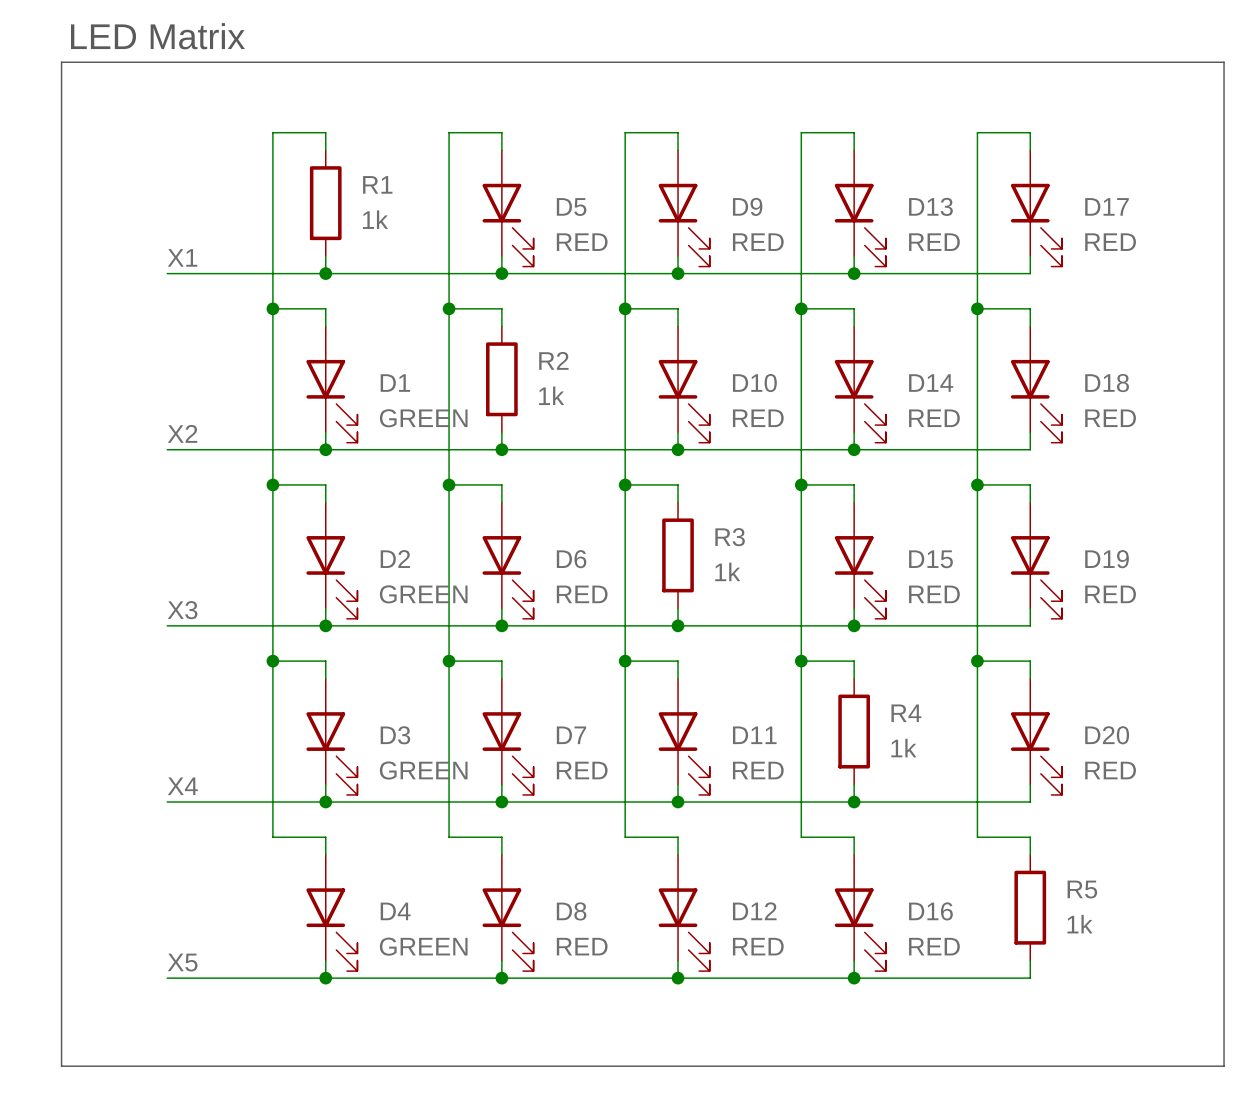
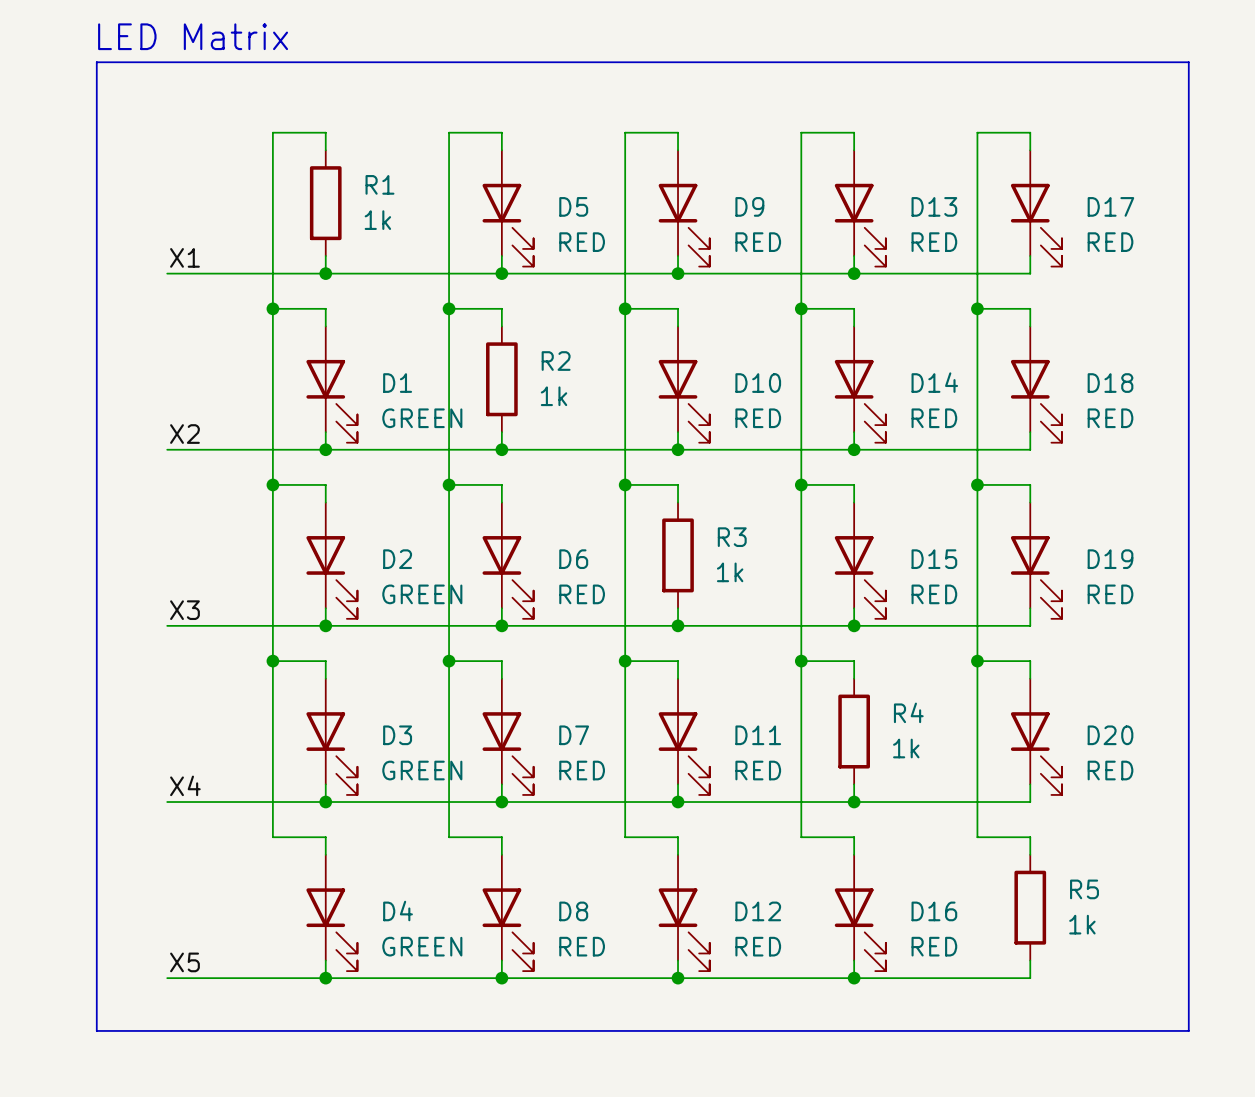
text position: LED Matrix (157, 36) -> LED Matrix (193, 36)
line: (96, 62) (61, 62) (61, 1066) (1224, 1066) (1224, 62) (1188, 62) -> (96, 62) (96, 1030) (1188, 1030) (1188, 62)

